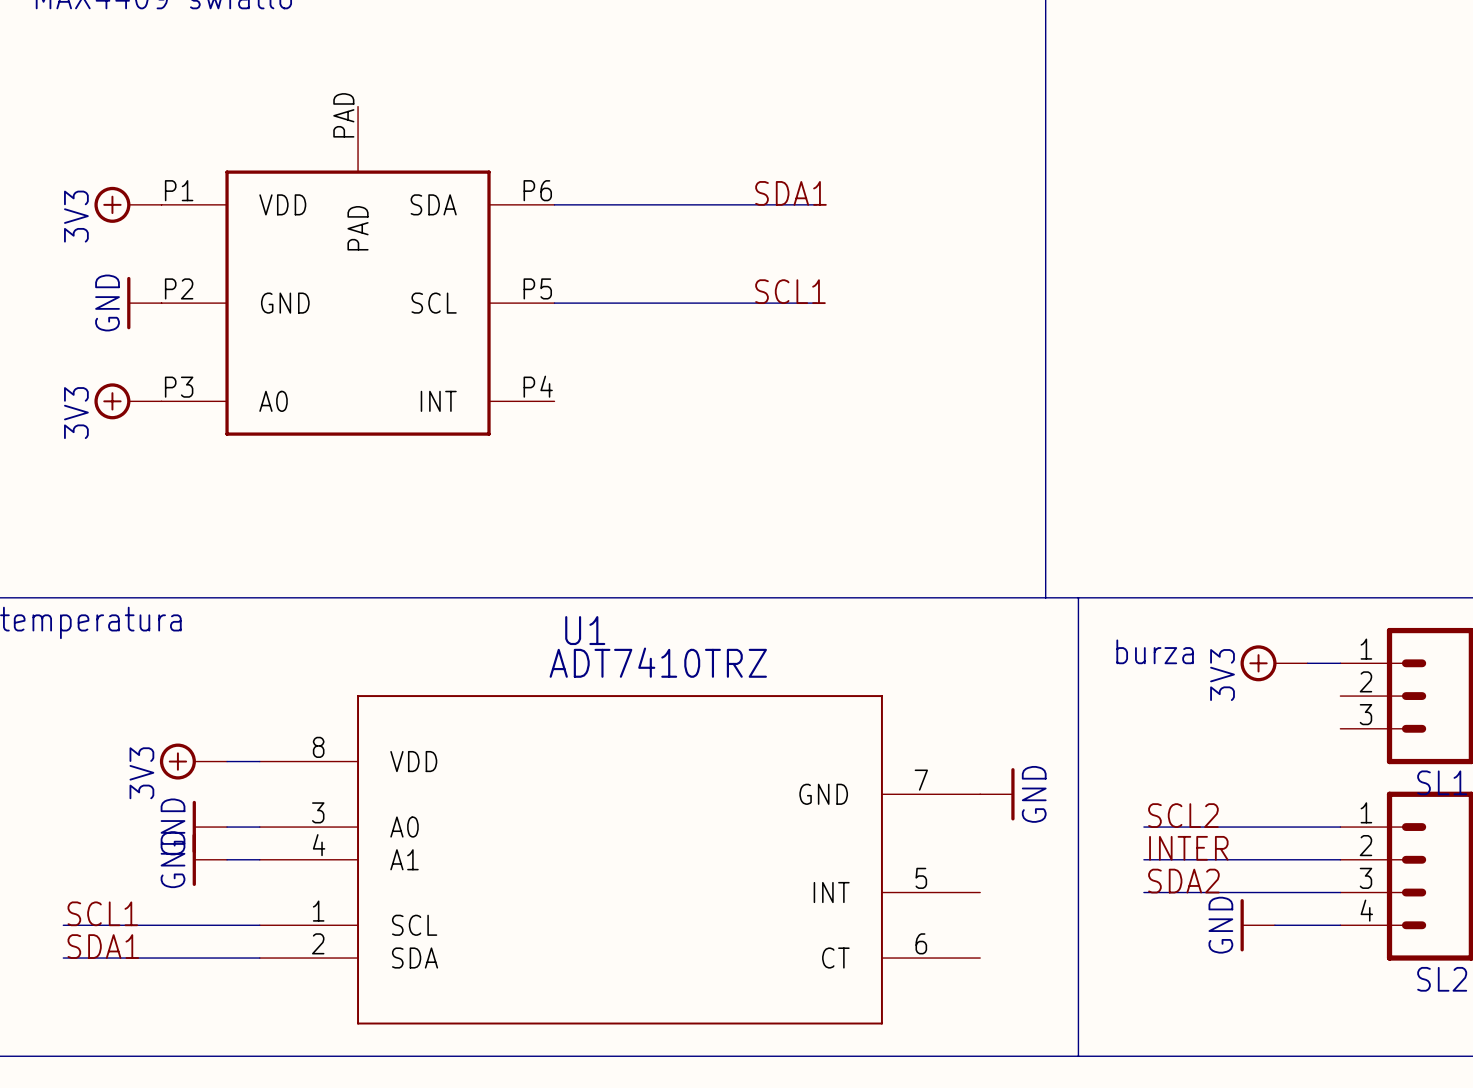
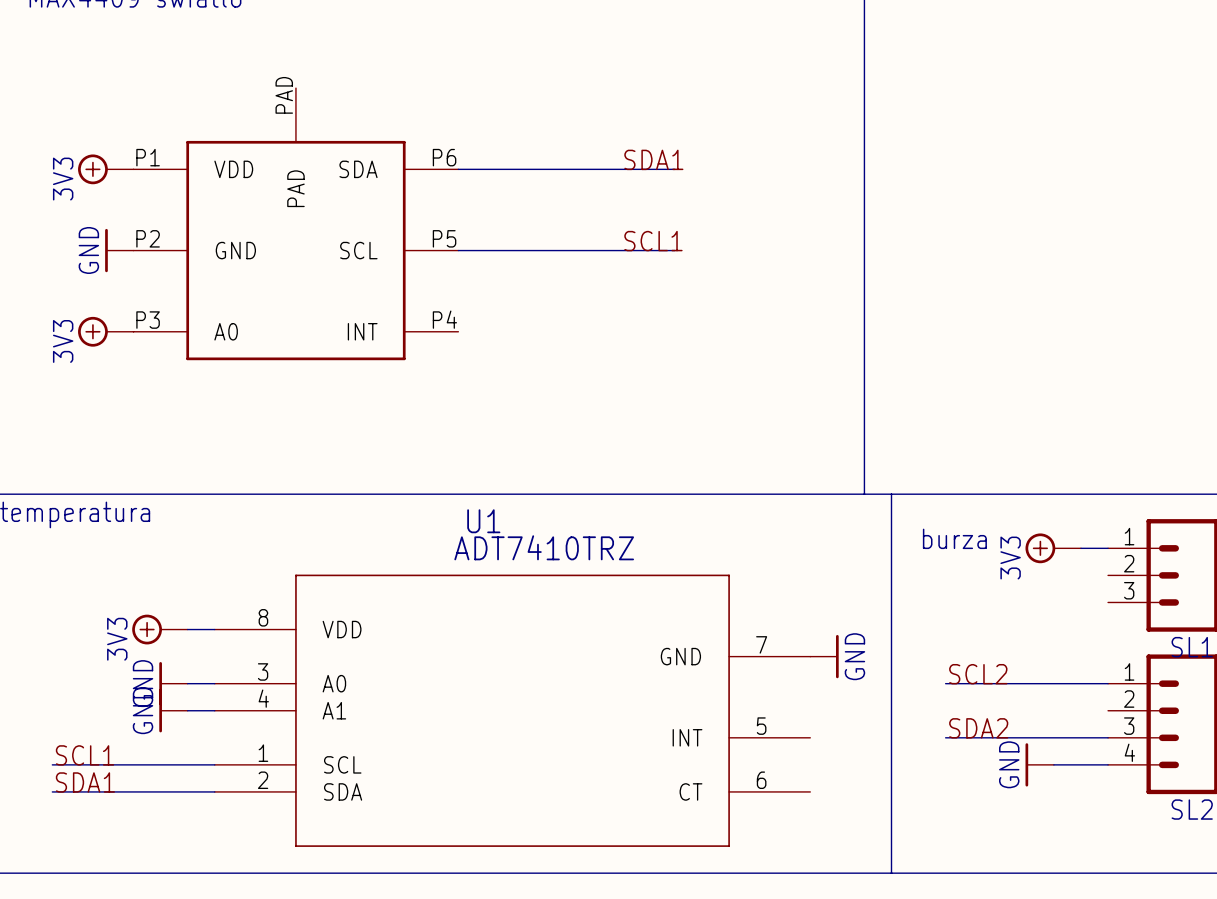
label: INTER (1188, 848) -> none
wire: (1143, 859) (1340, 859) -> none

